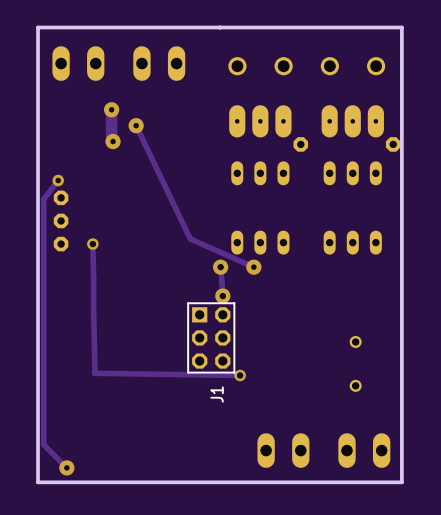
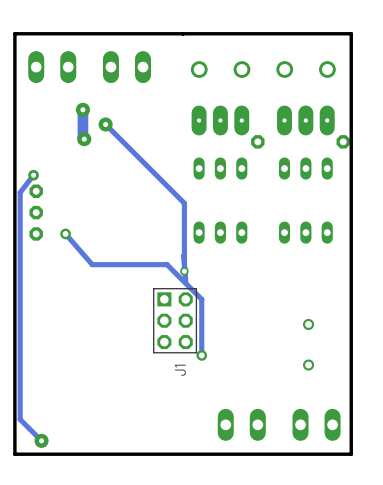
track: (136, 125) (190, 239) (253, 267) -> (105, 124) (184, 203) (184, 271)
track: (92, 244) (95, 373) (240, 375) -> (65, 233) (92, 264) (167, 264) (201, 299) (201, 355)
via: (220, 267) -> none
via: (253, 267) -> none
via: none -> (184, 271)
via: (222, 296) -> none

